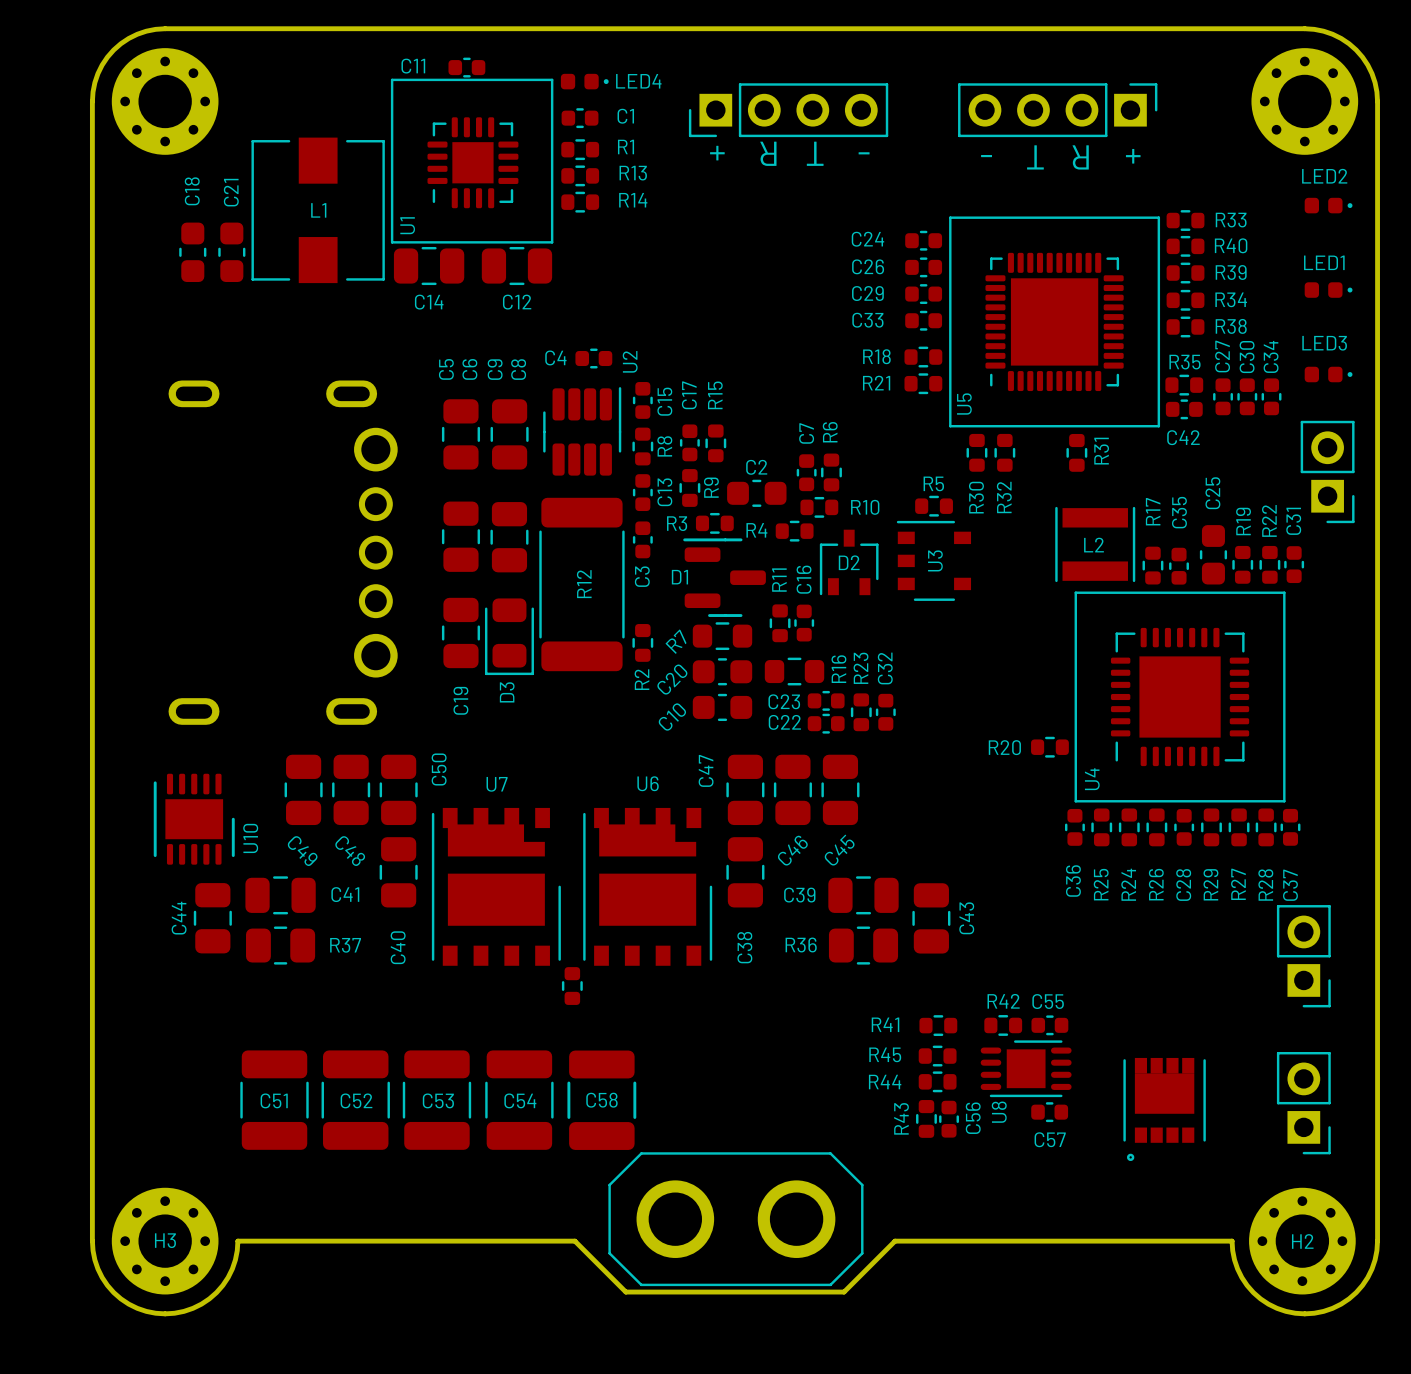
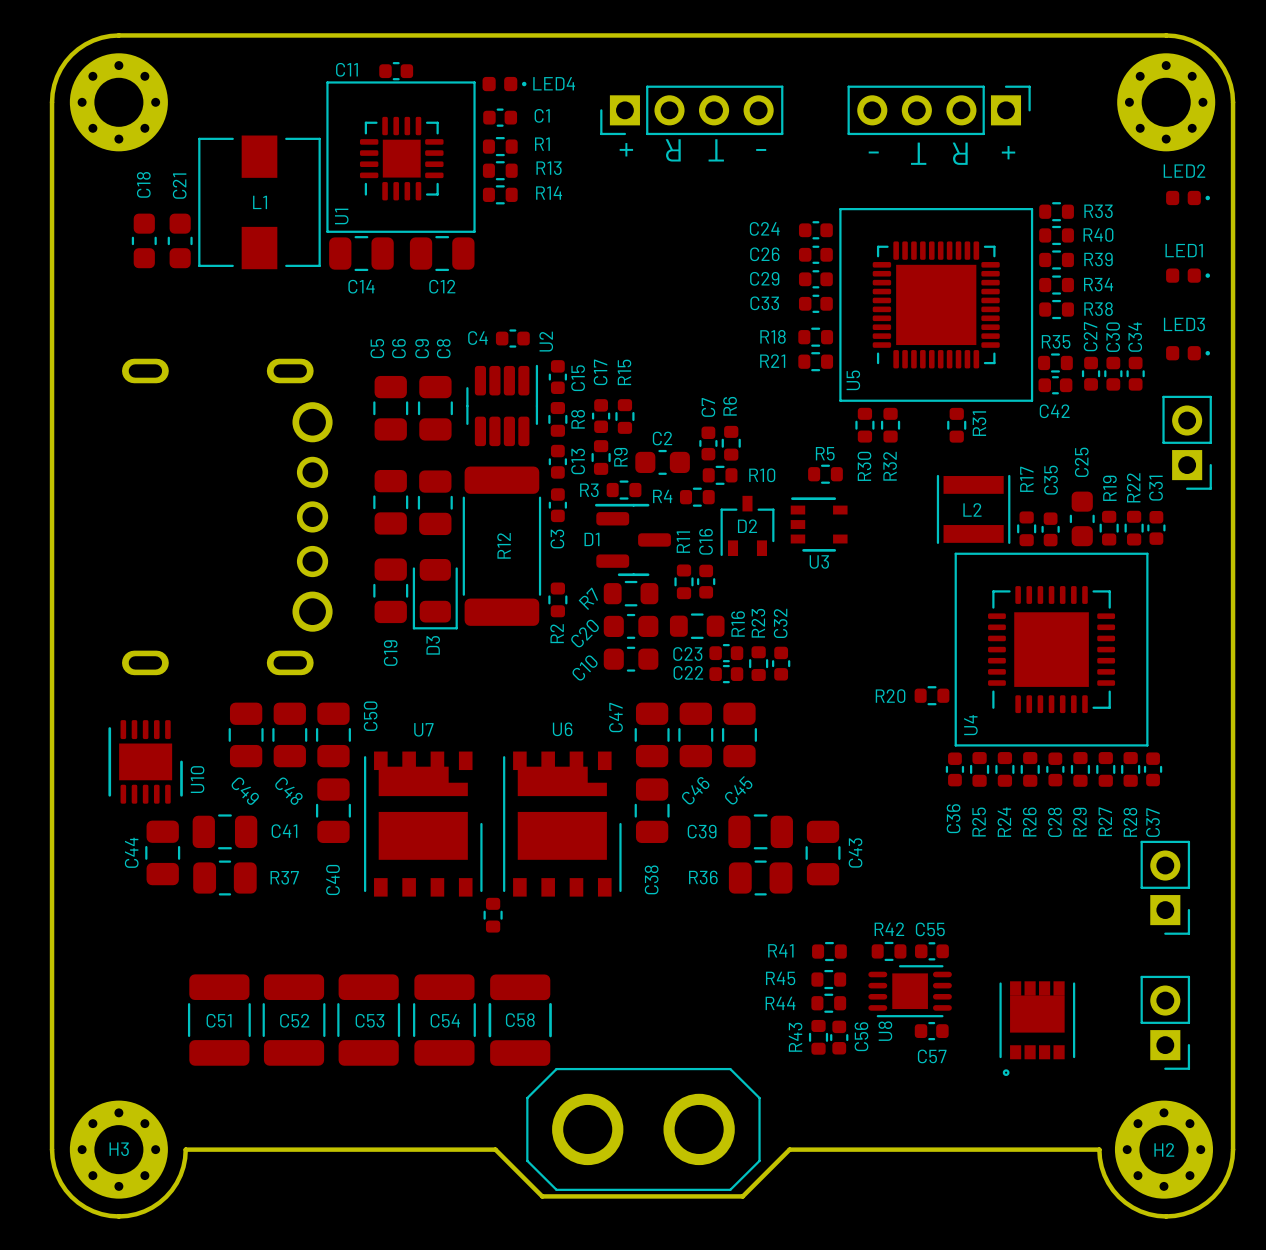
U3 footprint: [896, 520, 972, 601] -> [790, 497, 848, 552]
U3 name rotation: 0° (935, 560) -> 90° clockwise (819, 561)
U3 name position: U3 (935, 560) -> U3 (819, 561)

